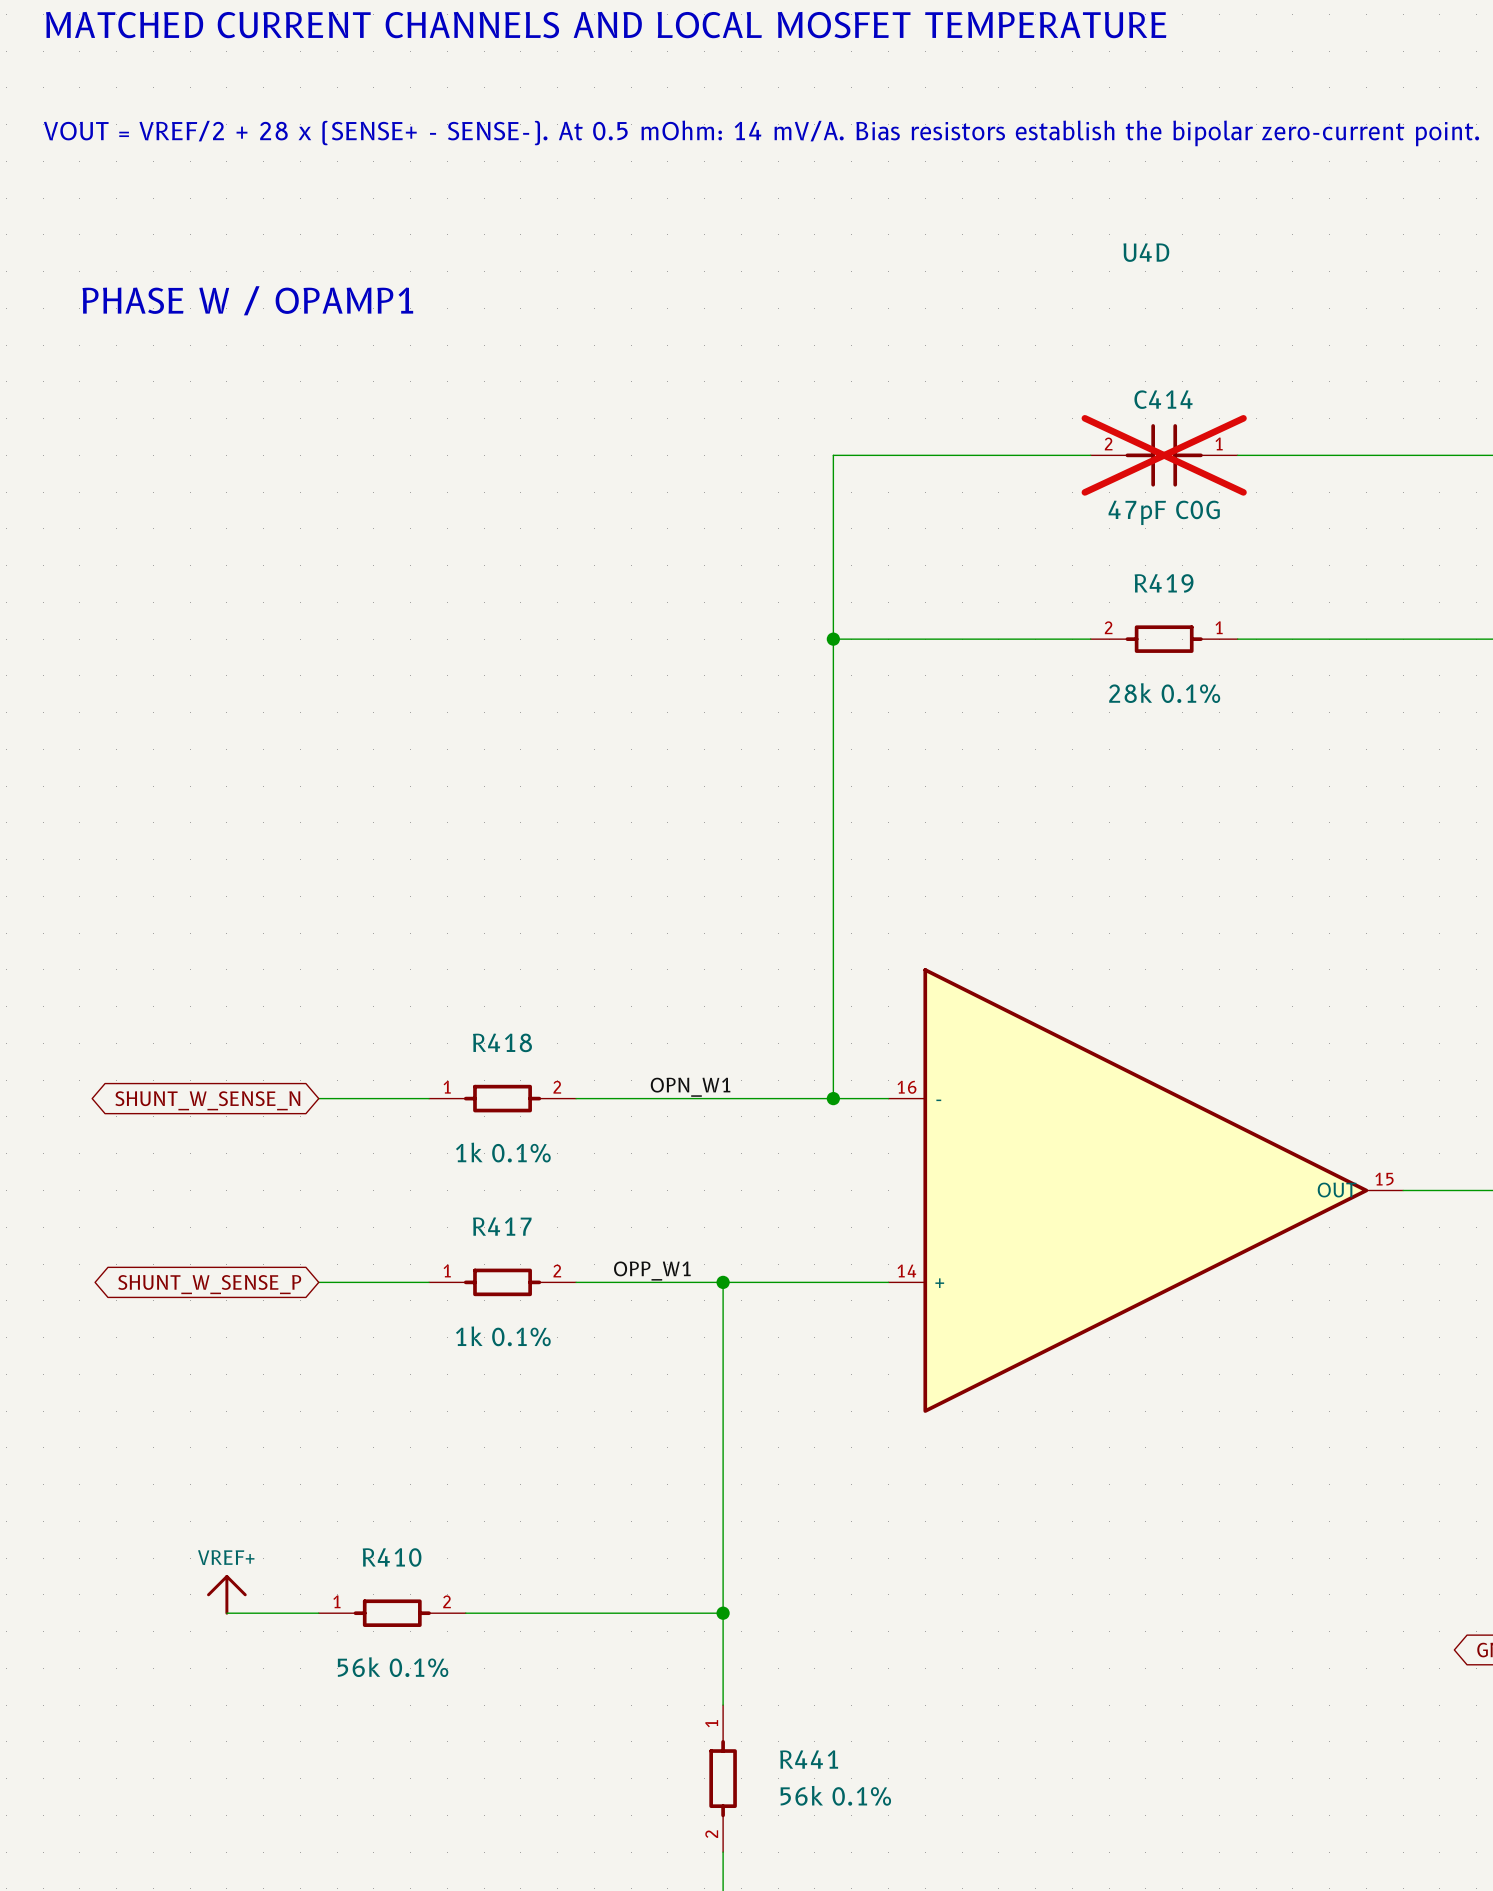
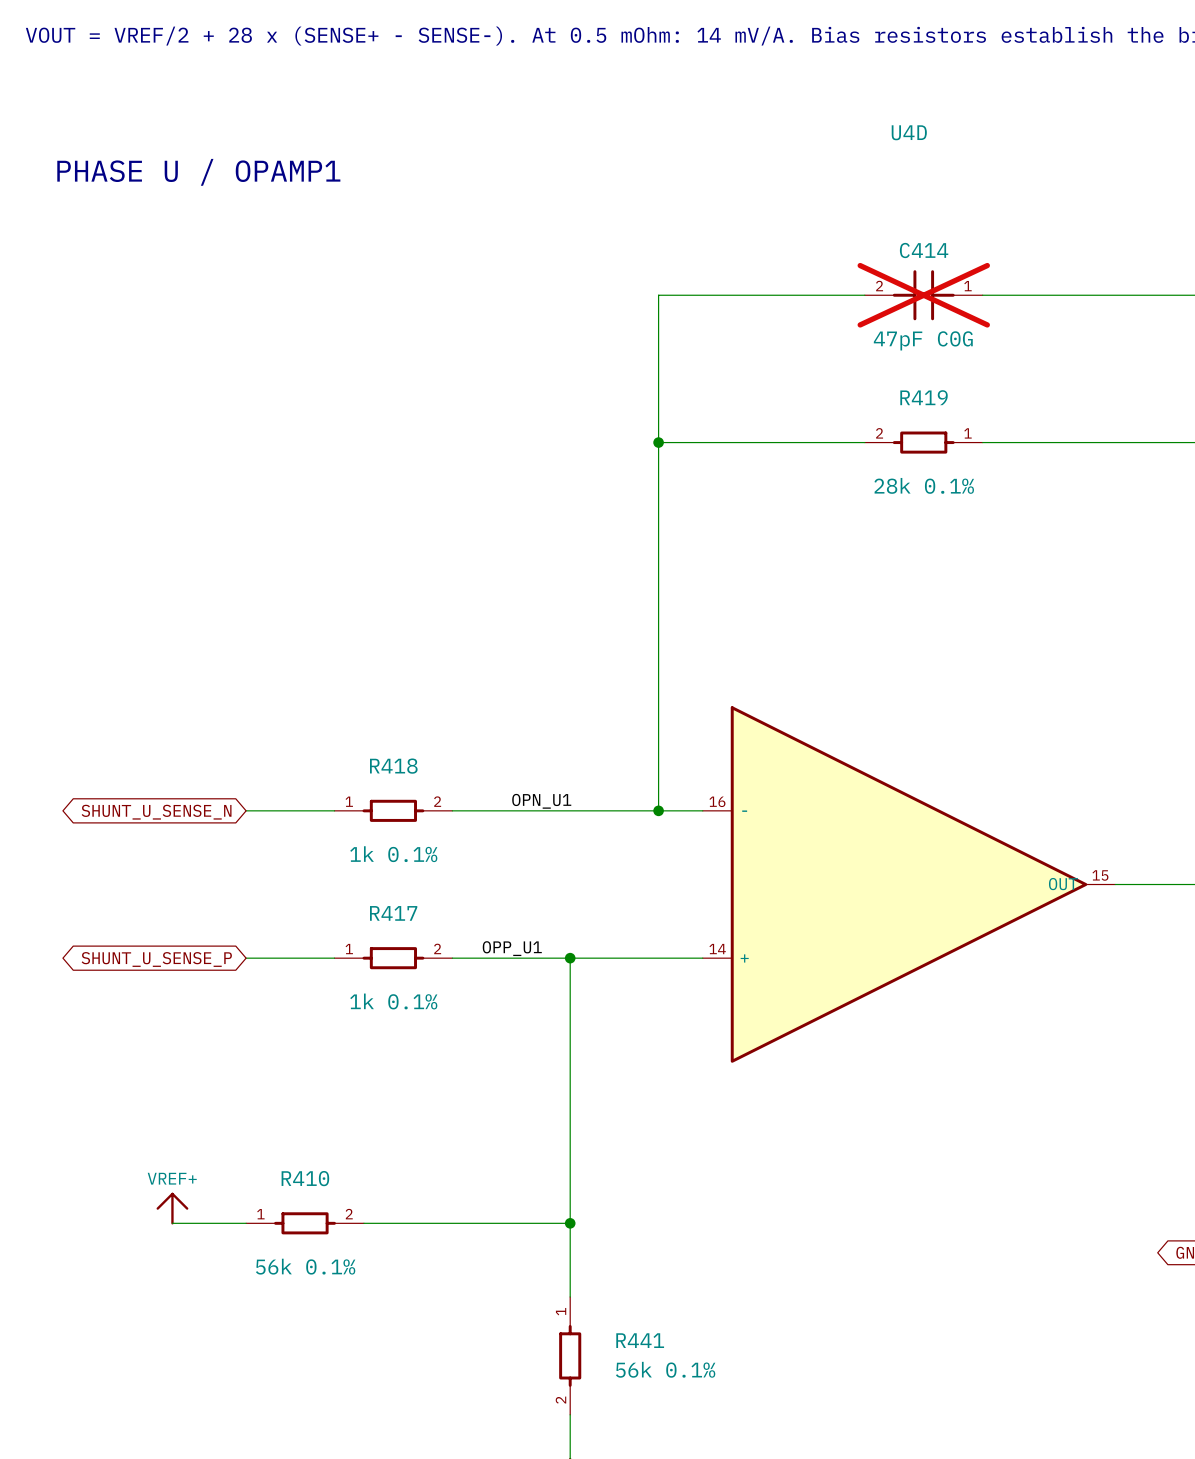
text: PHASE W / OPAMP1 (247, 300) -> PHASE U / OPAMP1 (198, 172)
label: OPN_W1 (690, 1087) -> OPN_U1 (541, 801)
global label: SHUNT_W_SENSE_N (207, 1100) -> SHUNT_U_SENSE_N (156, 812)
label: OPP_W1 (652, 1271) -> OPP_U1 (512, 948)
global label: SHUNT_W_SENSE_P (209, 1284) -> SHUNT_U_SENSE_P (156, 959)

